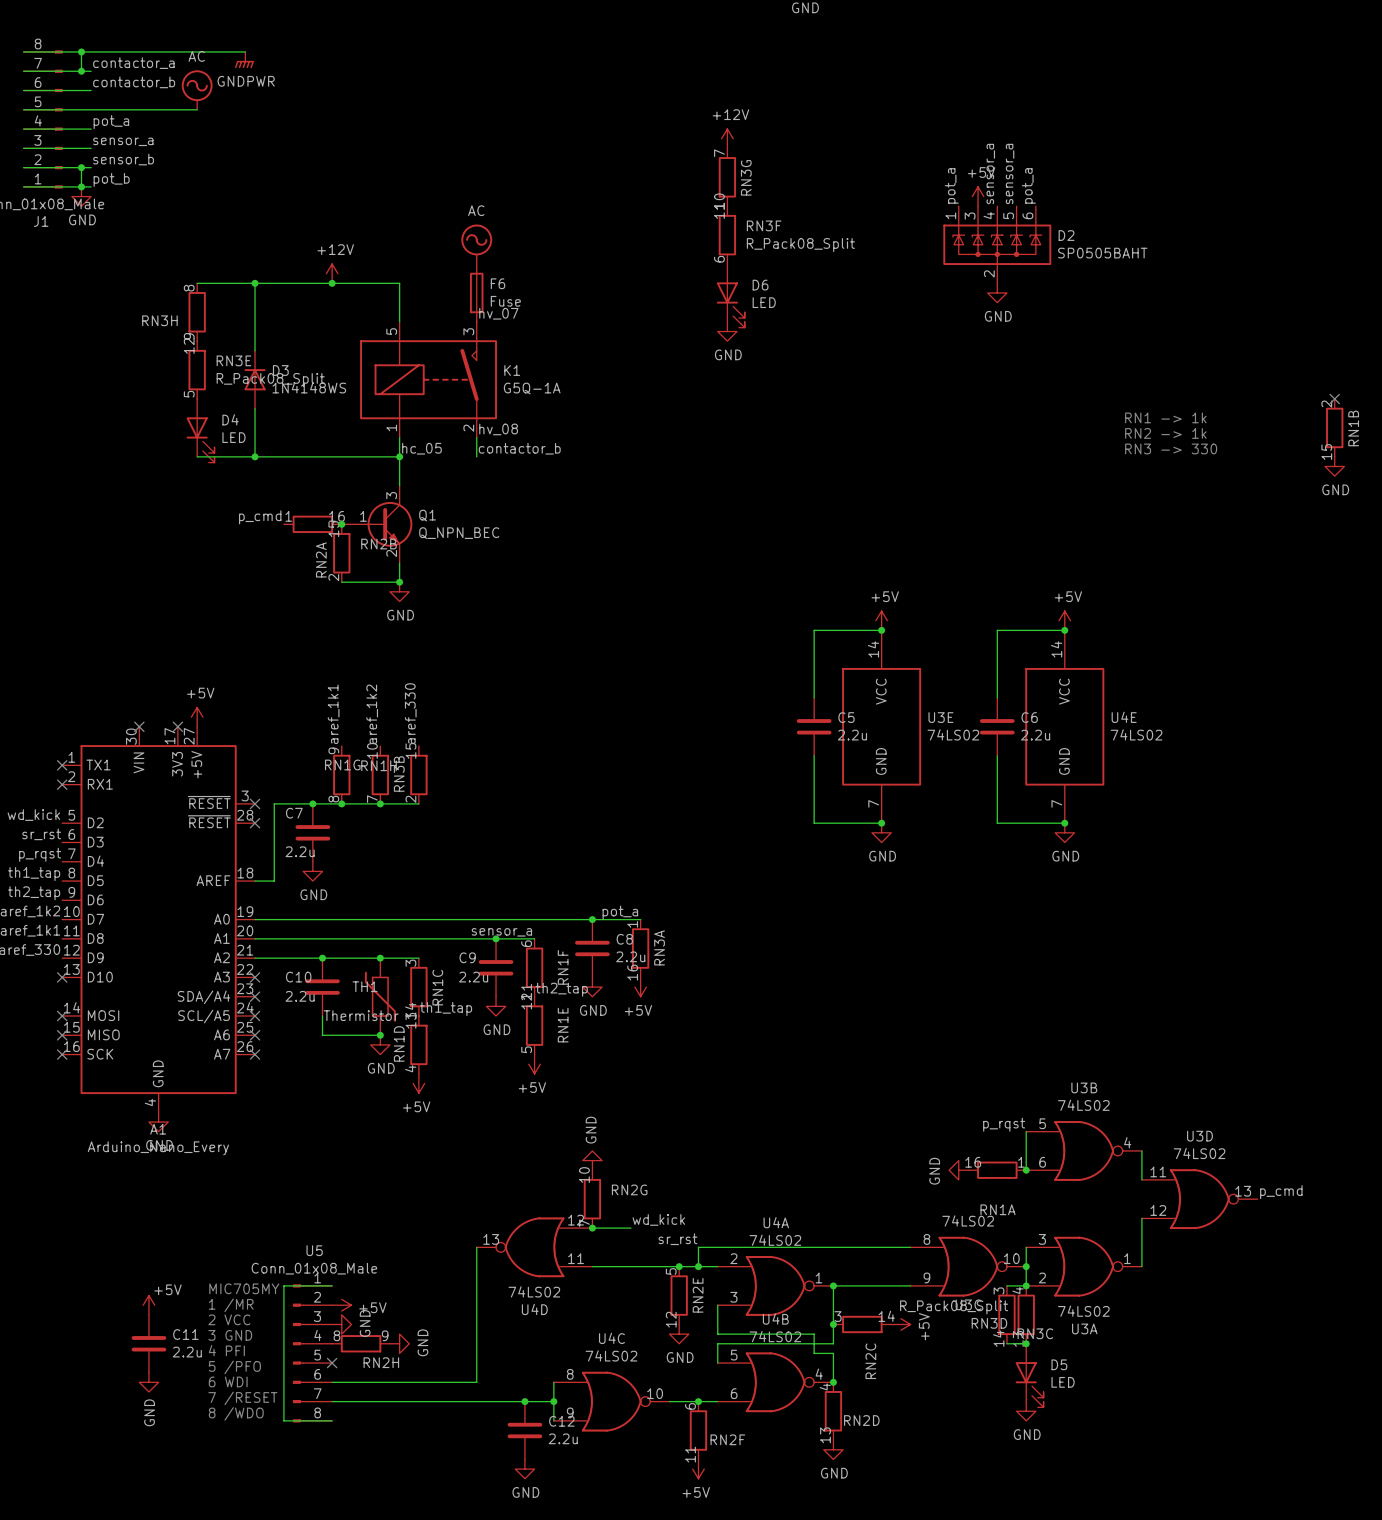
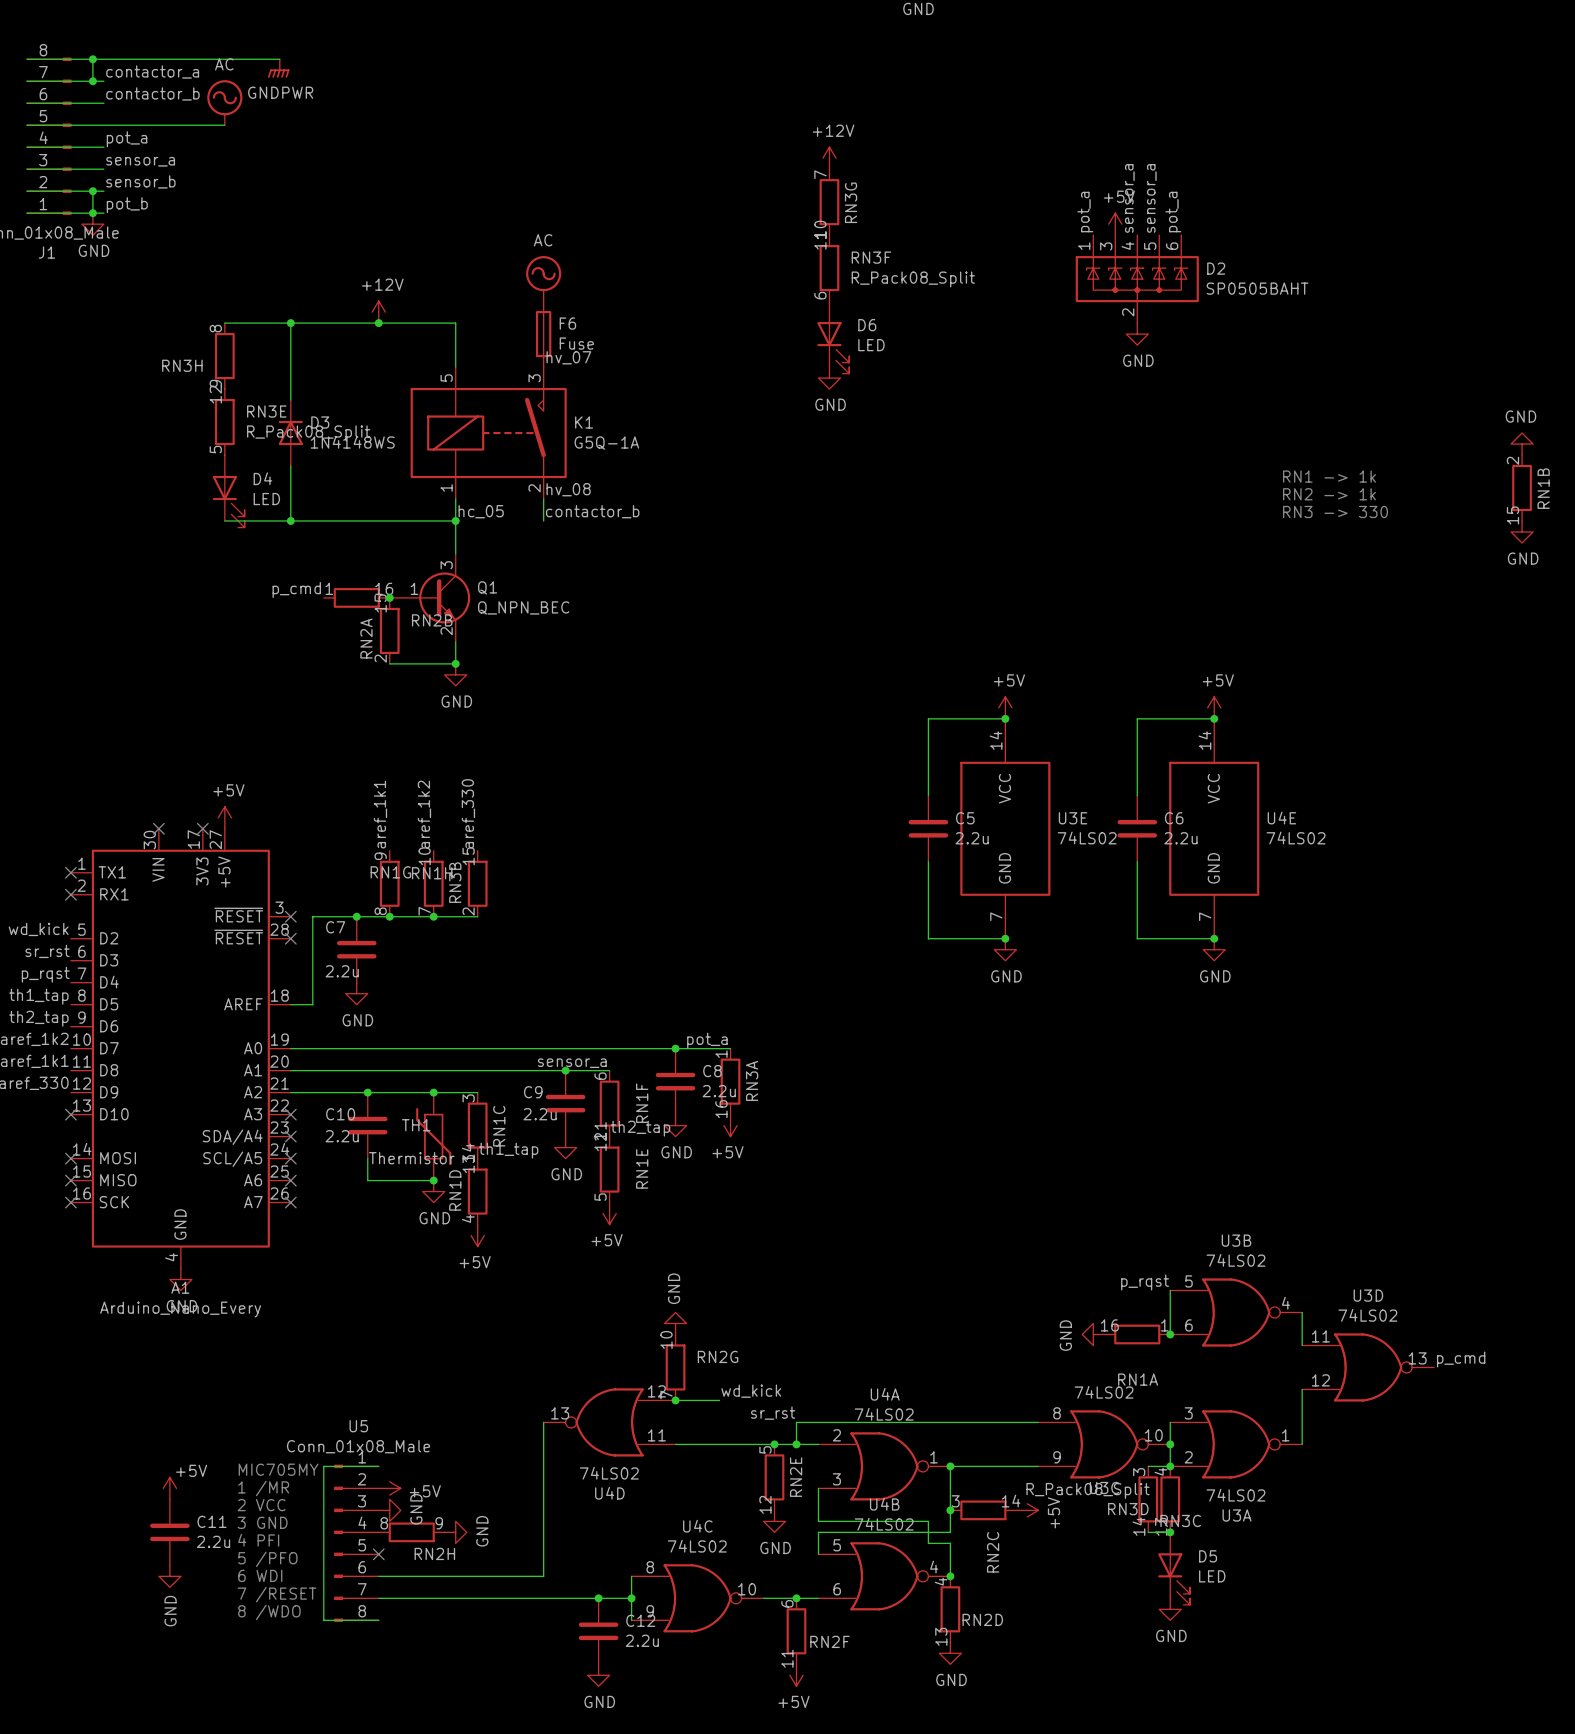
power symbol: none -> GND (1522, 444)
no-connect mark: (1334, 399) -> none

